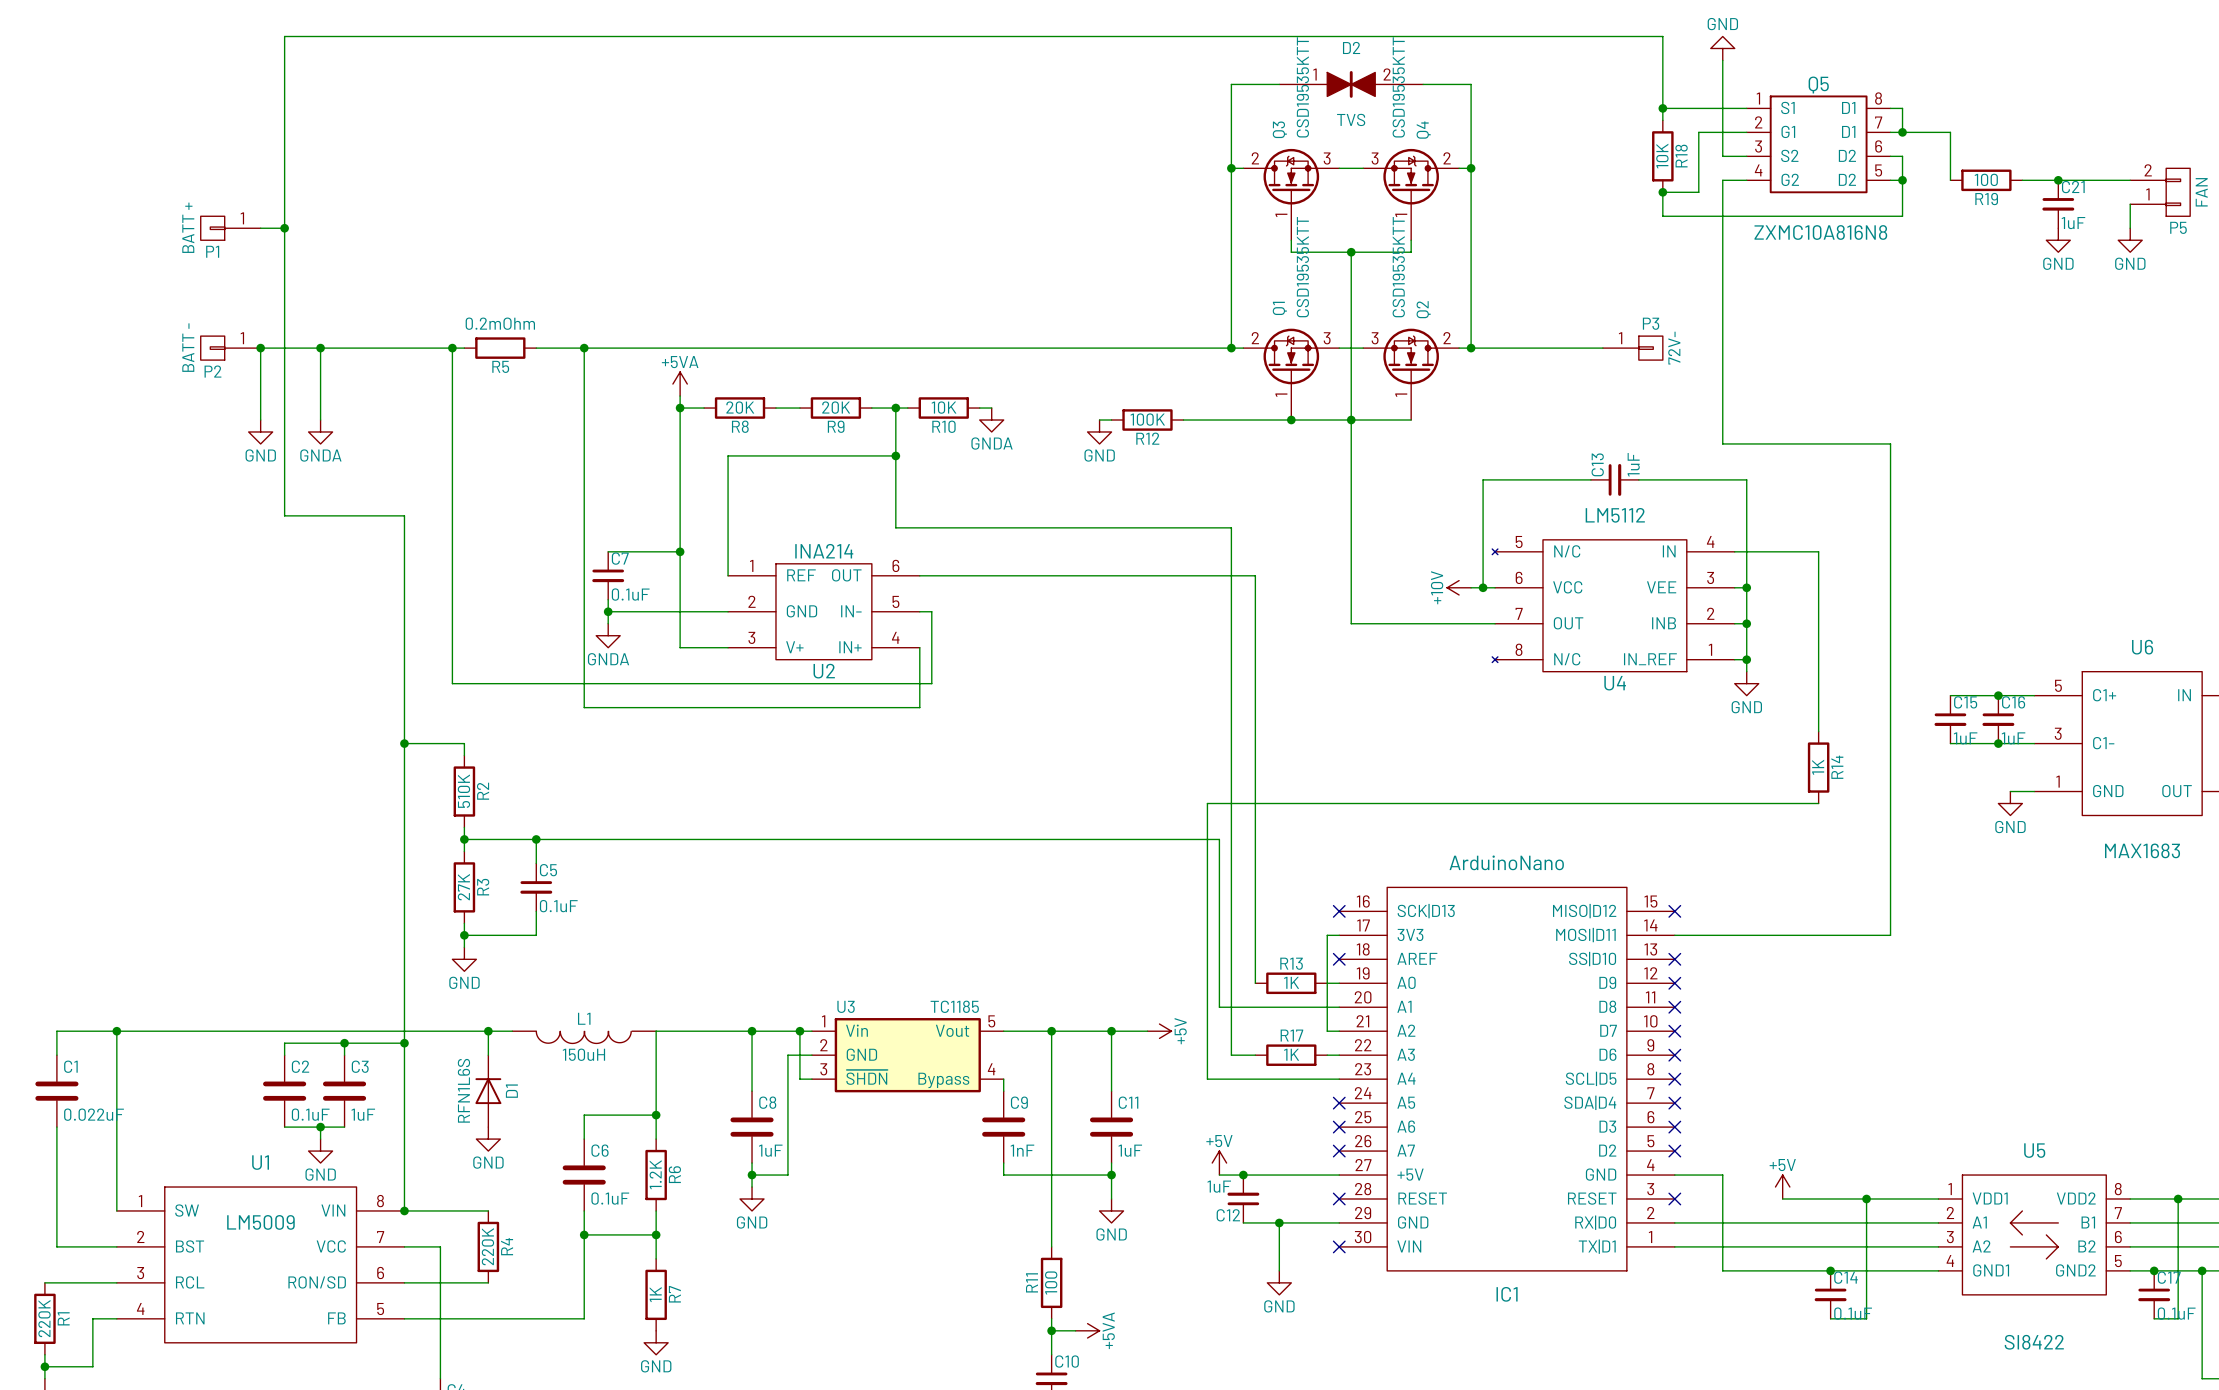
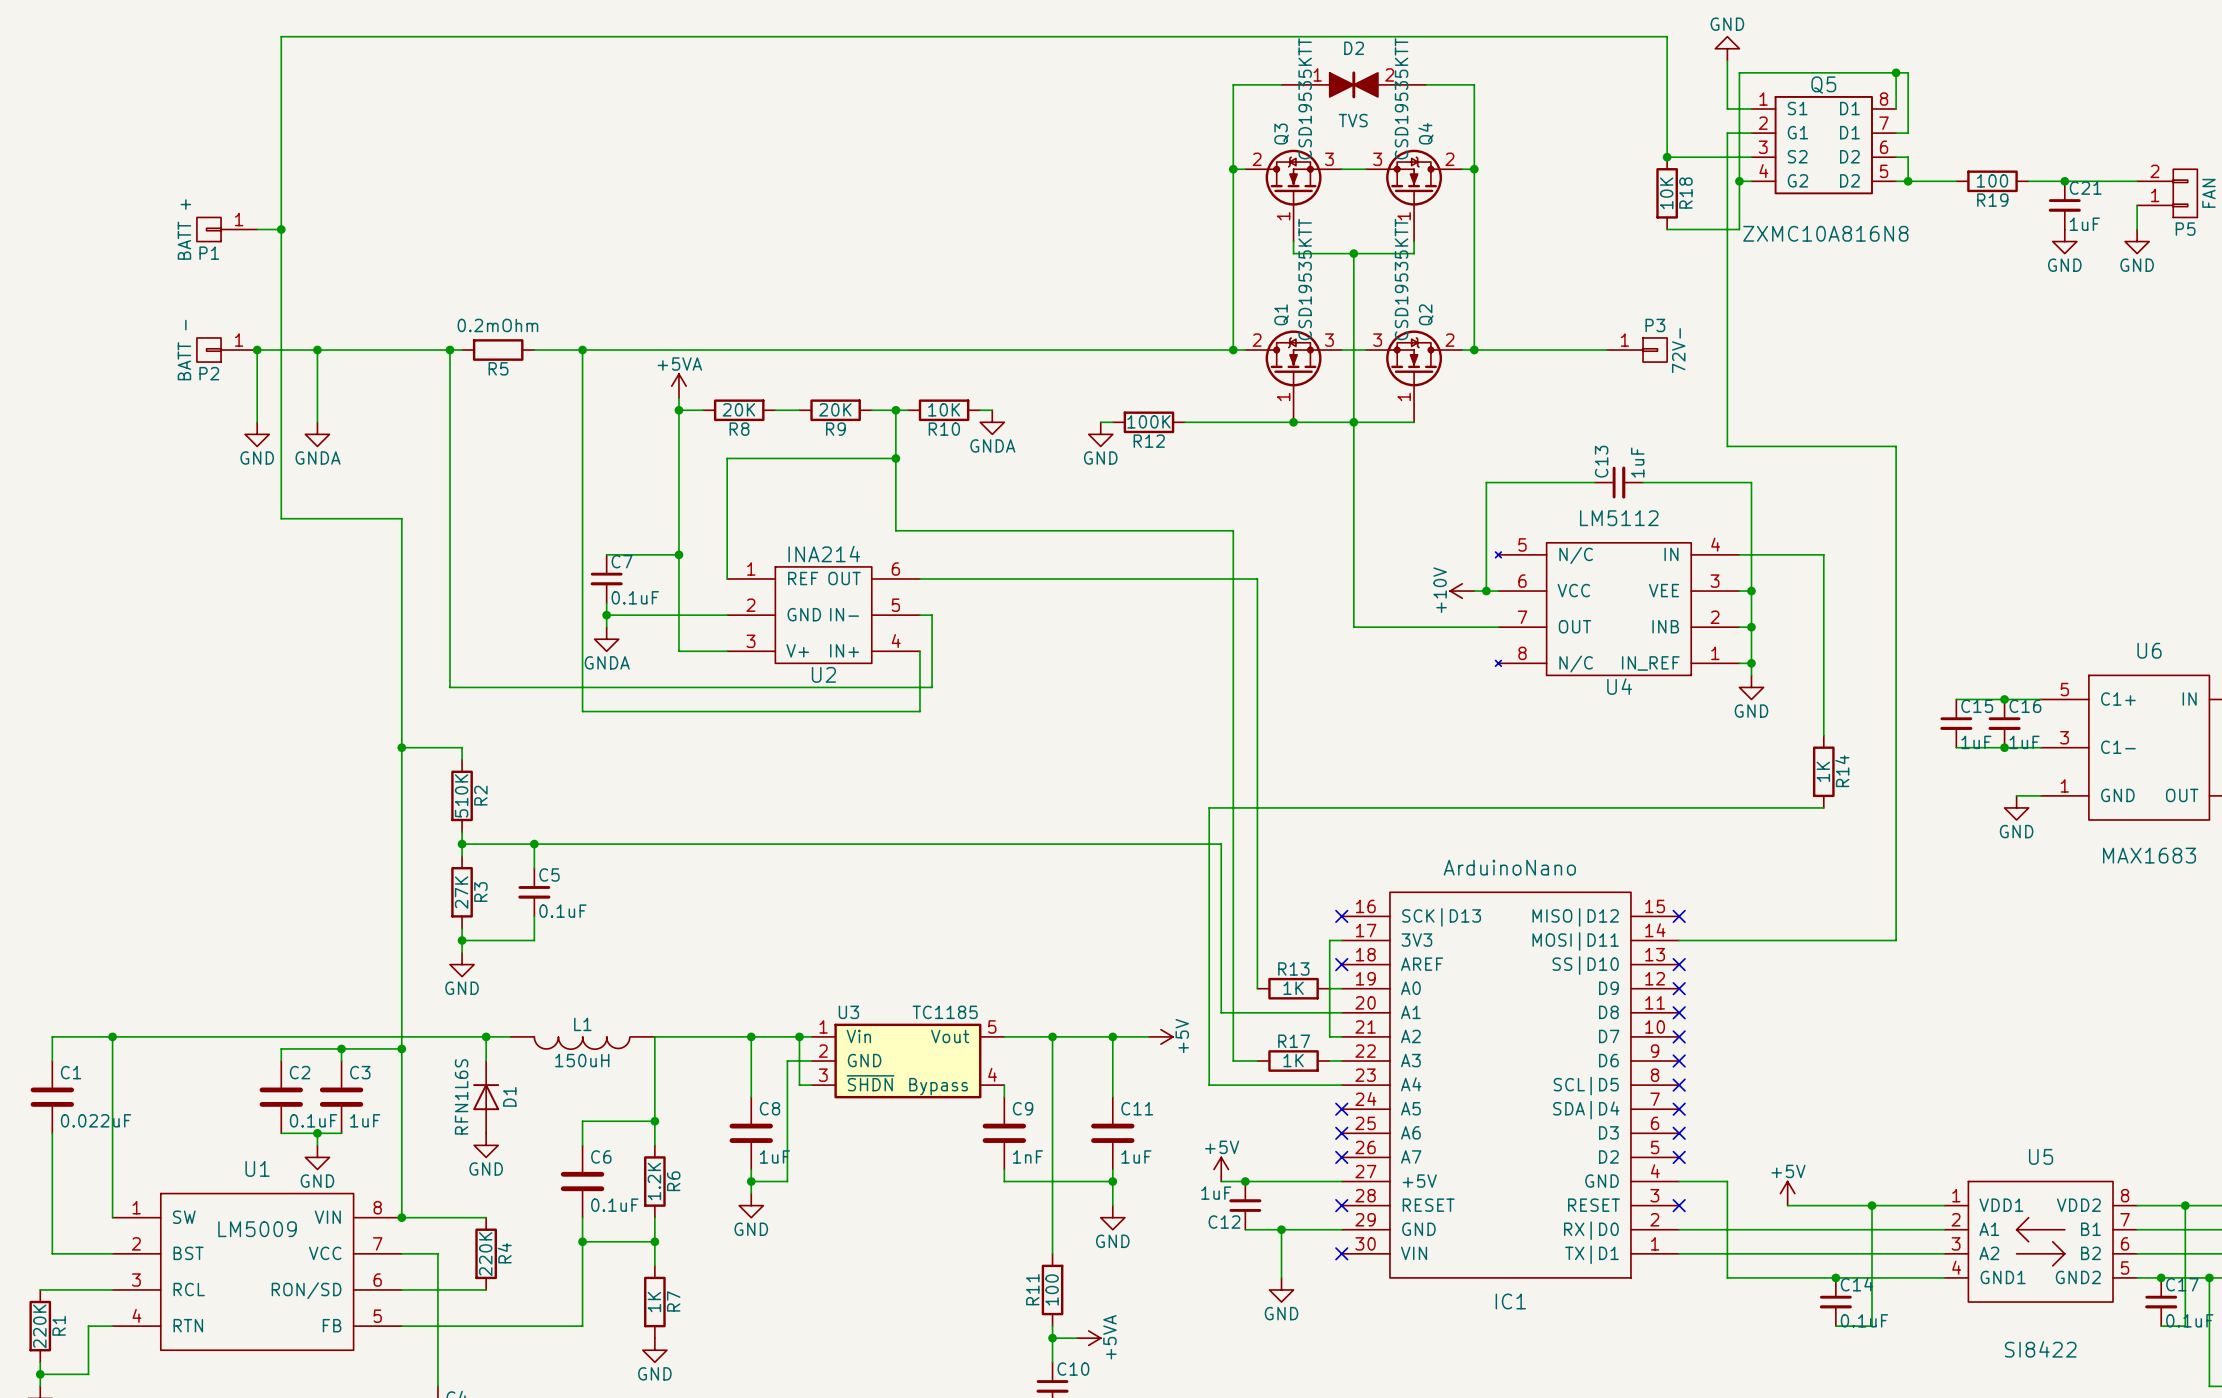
junction: none -> (1896, 72)
wire: (1662, 108) (1722, 108) (1722, 132) (1698, 132) (1698, 192) (1662, 192) (1662, 216) (1902, 216) (1902, 180) -> none
junction: (1662, 108) -> none
wire: (1890, 108) (1902, 108) -> (1896, 109) (1896, 72)
wire: none -> (1908, 109) (1908, 72) (1739, 72) (1739, 229) (1667, 229)
wire: (1902, 132) (1950, 132) (1950, 180) -> (1908, 181) (1956, 181)
junction: (1902, 132) -> none
R18 position: (1662, 156) -> (1667, 193)
junction: none -> (1667, 157)
wire: (1722, 180) (1734, 180) -> (1727, 181) (1727, 157) (1667, 157) (1667, 121)
junction: none -> (1739, 181)
junction: (1662, 192) -> none

